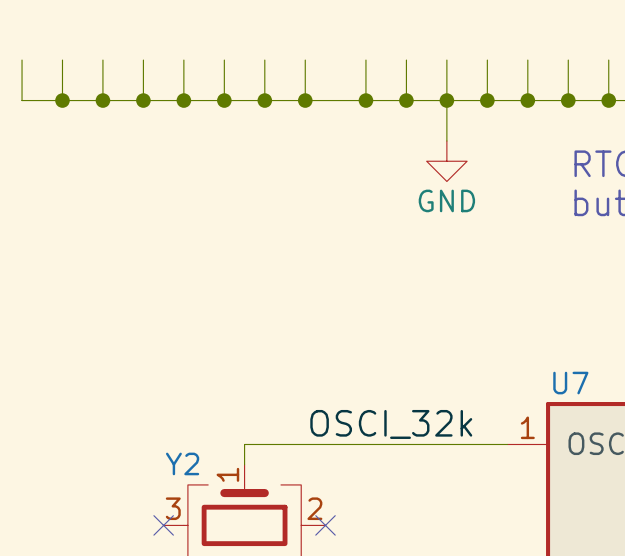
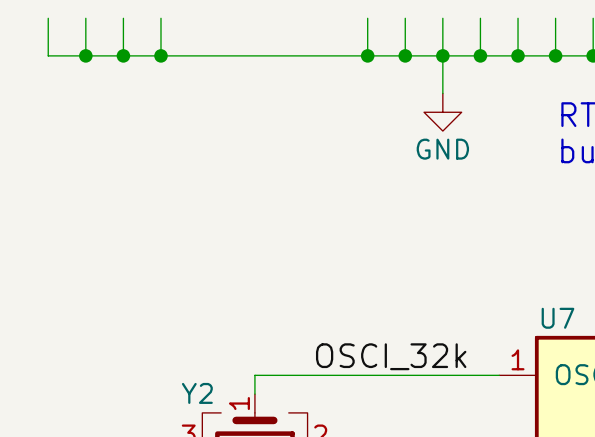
wire: (183, 60) (183, 100) -> none
wire: (224, 60) (224, 100) -> none
wire: (264, 60) (264, 100) -> none
wire: (305, 60) (305, 100) -> none
junction: (183, 100) -> none
junction: (224, 100) -> none
junction: (264, 100) -> none
junction: (305, 100) -> none

